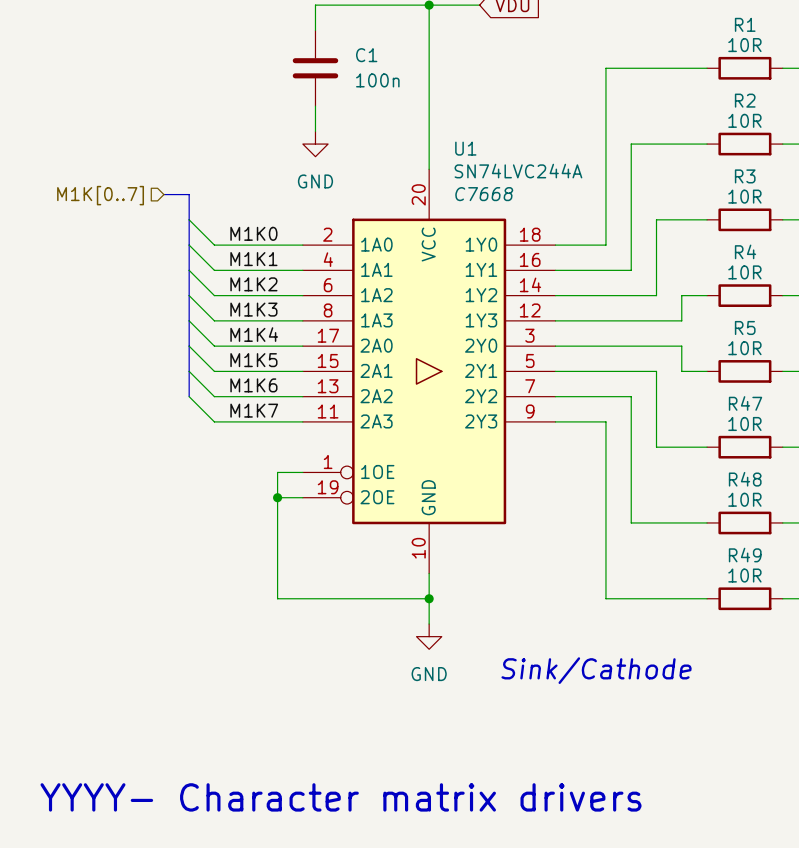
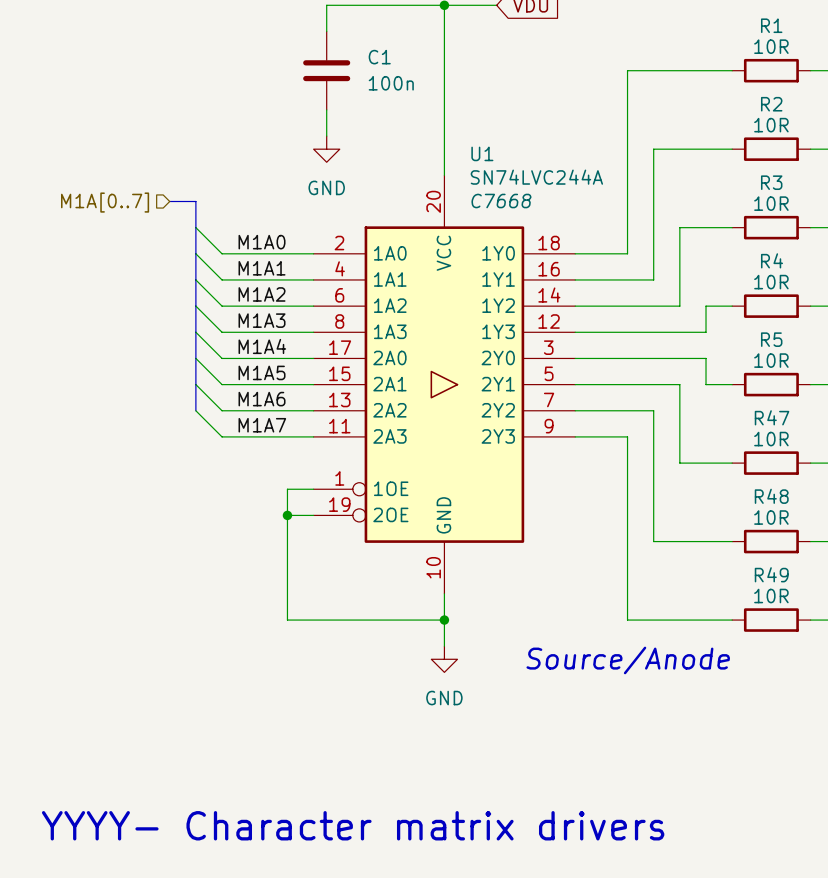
hierarchical label: M1K[0..7] (100, 195) -> M1A[0..7] (105, 202)
label: M1K0 (253, 233) -> M1A0 (262, 242)
label: M1K1 (253, 259) -> M1A1 (262, 268)
label: M1K2 (253, 284) -> M1A2 (262, 294)
label: M1K3 (253, 309) -> M1A3 (262, 320)
label: M1K4 (254, 334) -> M1A4 (262, 346)
label: M1K5 (253, 360) -> M1A5 (262, 372)
label: M1K6 (253, 385) -> M1A6 (262, 399)
label: M1K7 (254, 410) -> M1A7 (262, 425)
text: none -> Source/Anode (628, 660)
text: Sink/Cathode (596, 670) -> none

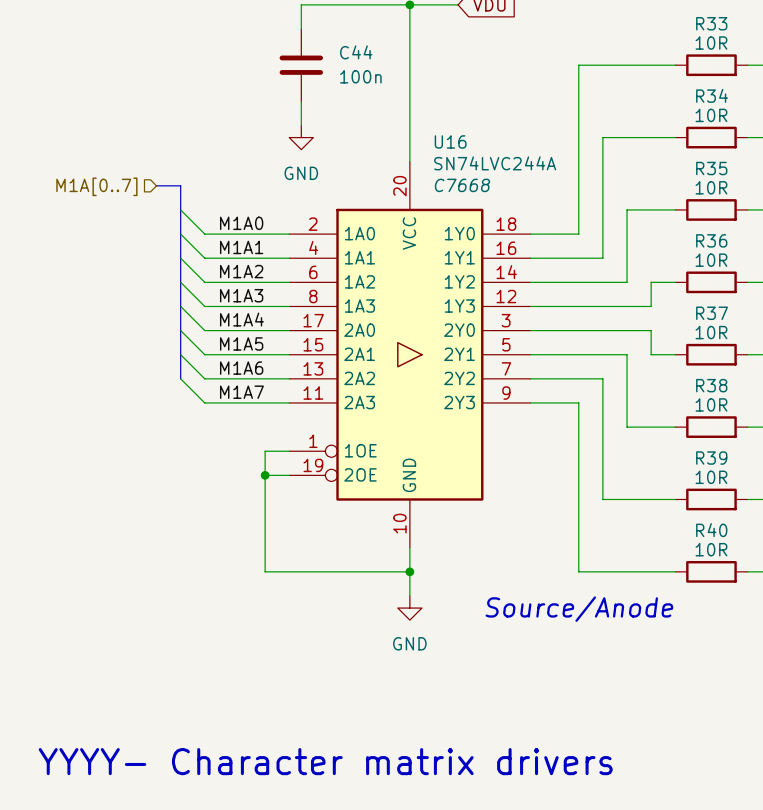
R1 name: R1 (771, 25) -> R33 (711, 23)
C1 name: C1 (379, 57) -> C44 (356, 52)
R2 name: R2 (771, 104) -> R34 (712, 95)
U1 name: U1 (482, 153) -> U16 (450, 141)
R3 name: R3 (771, 182) -> R35 (711, 168)
R4 name: R4 (772, 260) -> R36 (711, 240)
R5 name: R5 (771, 339) -> R37 (712, 313)
R47 name: R47 (772, 417) -> R38 (711, 385)
R48 name: R48 (771, 496) -> R39 (711, 458)
R49 name: R49 (771, 574) -> R40 (711, 530)

